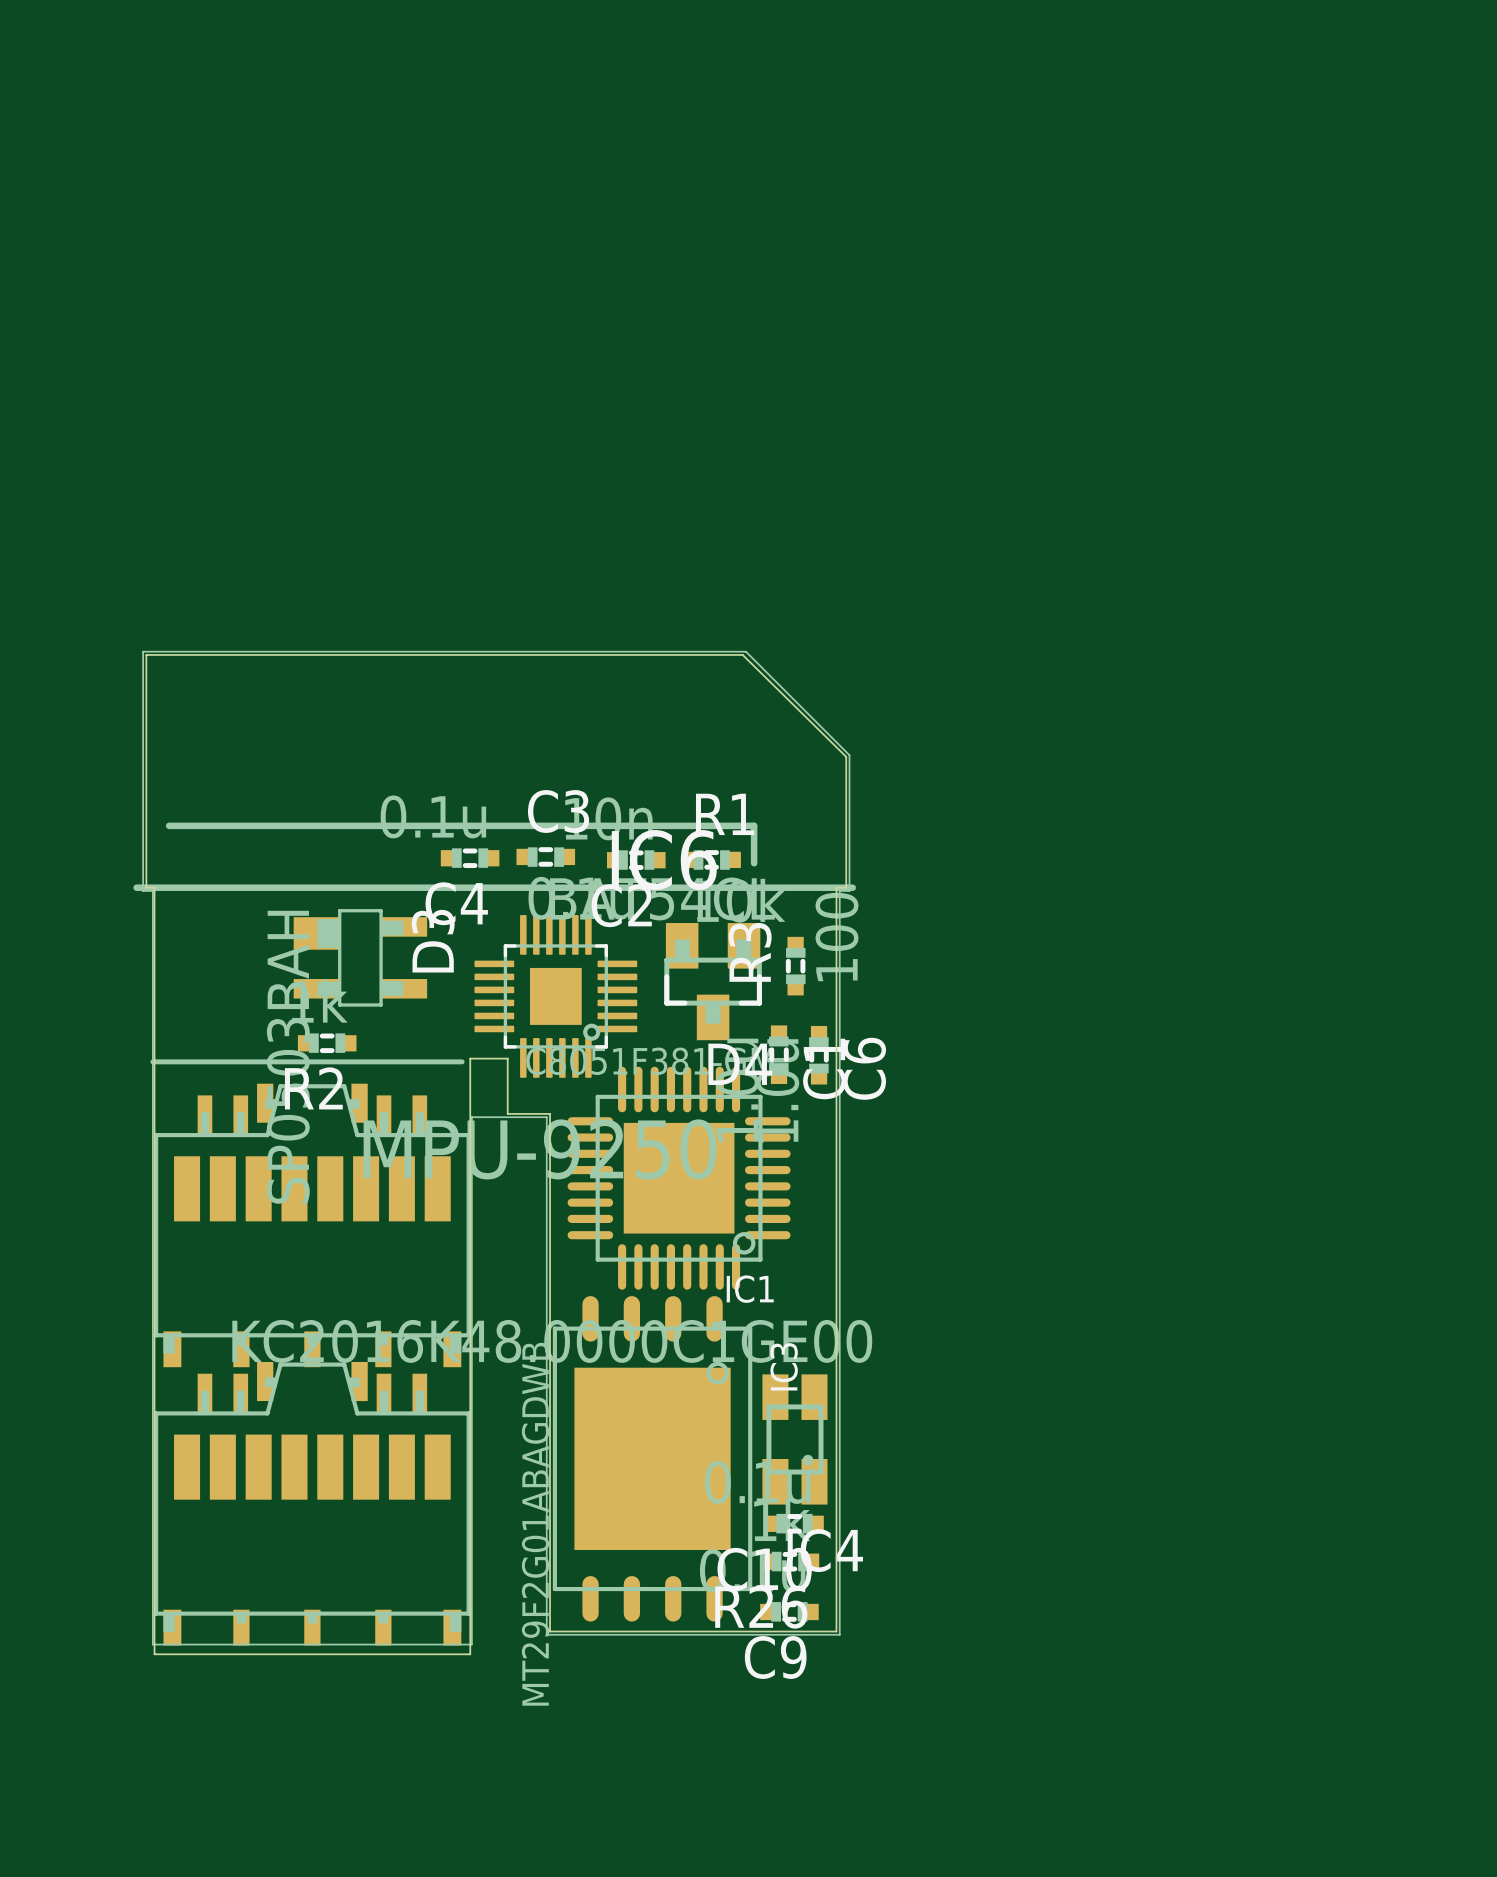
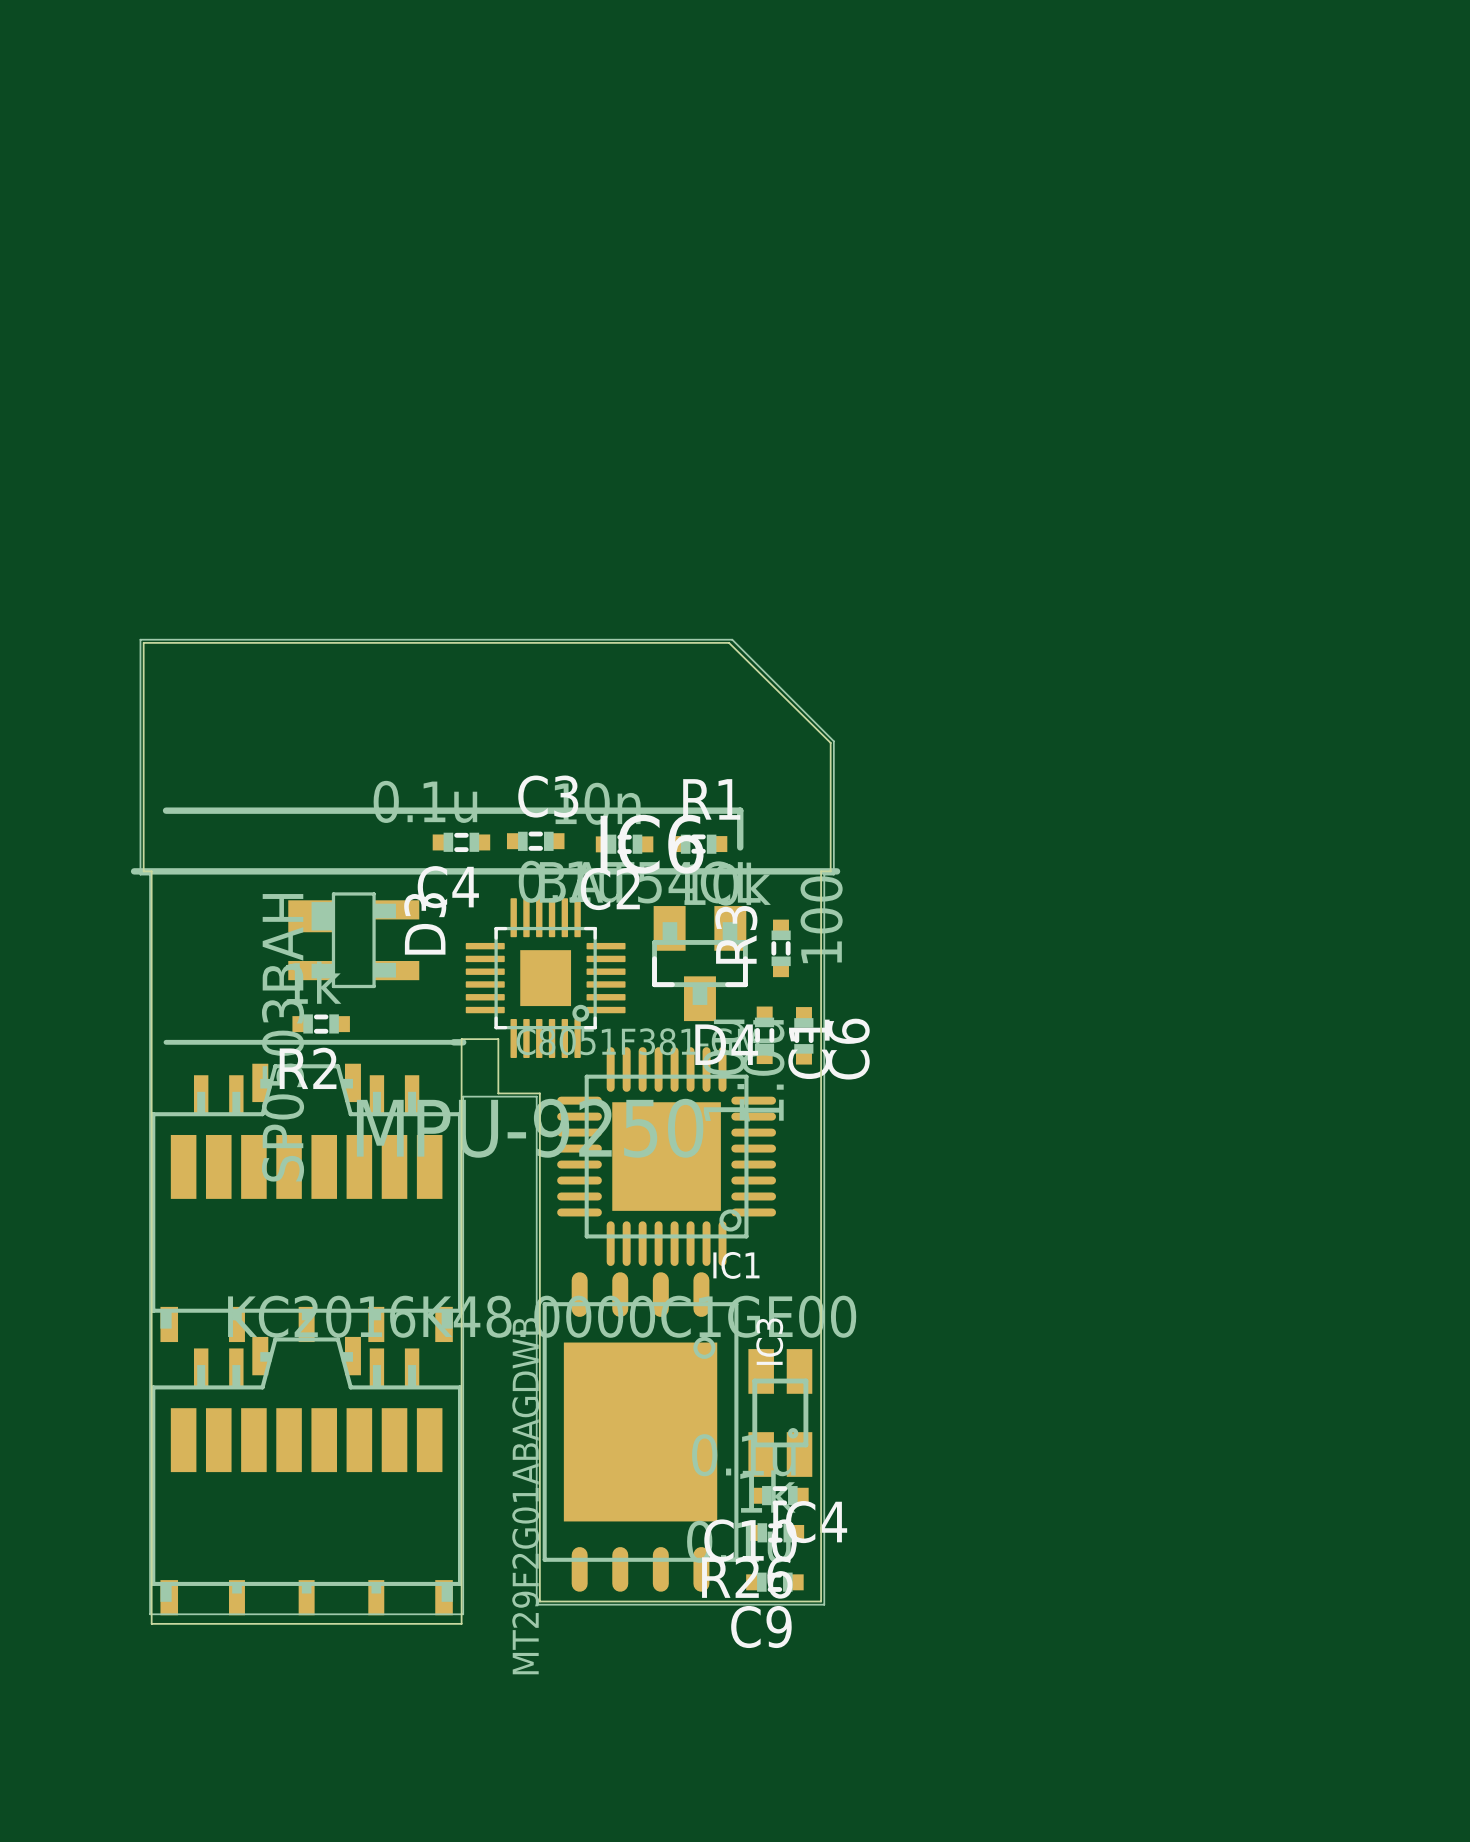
line: (152, 1061) (169, 1061) -> none
line: none -> (453, 1042) (463, 1042)

